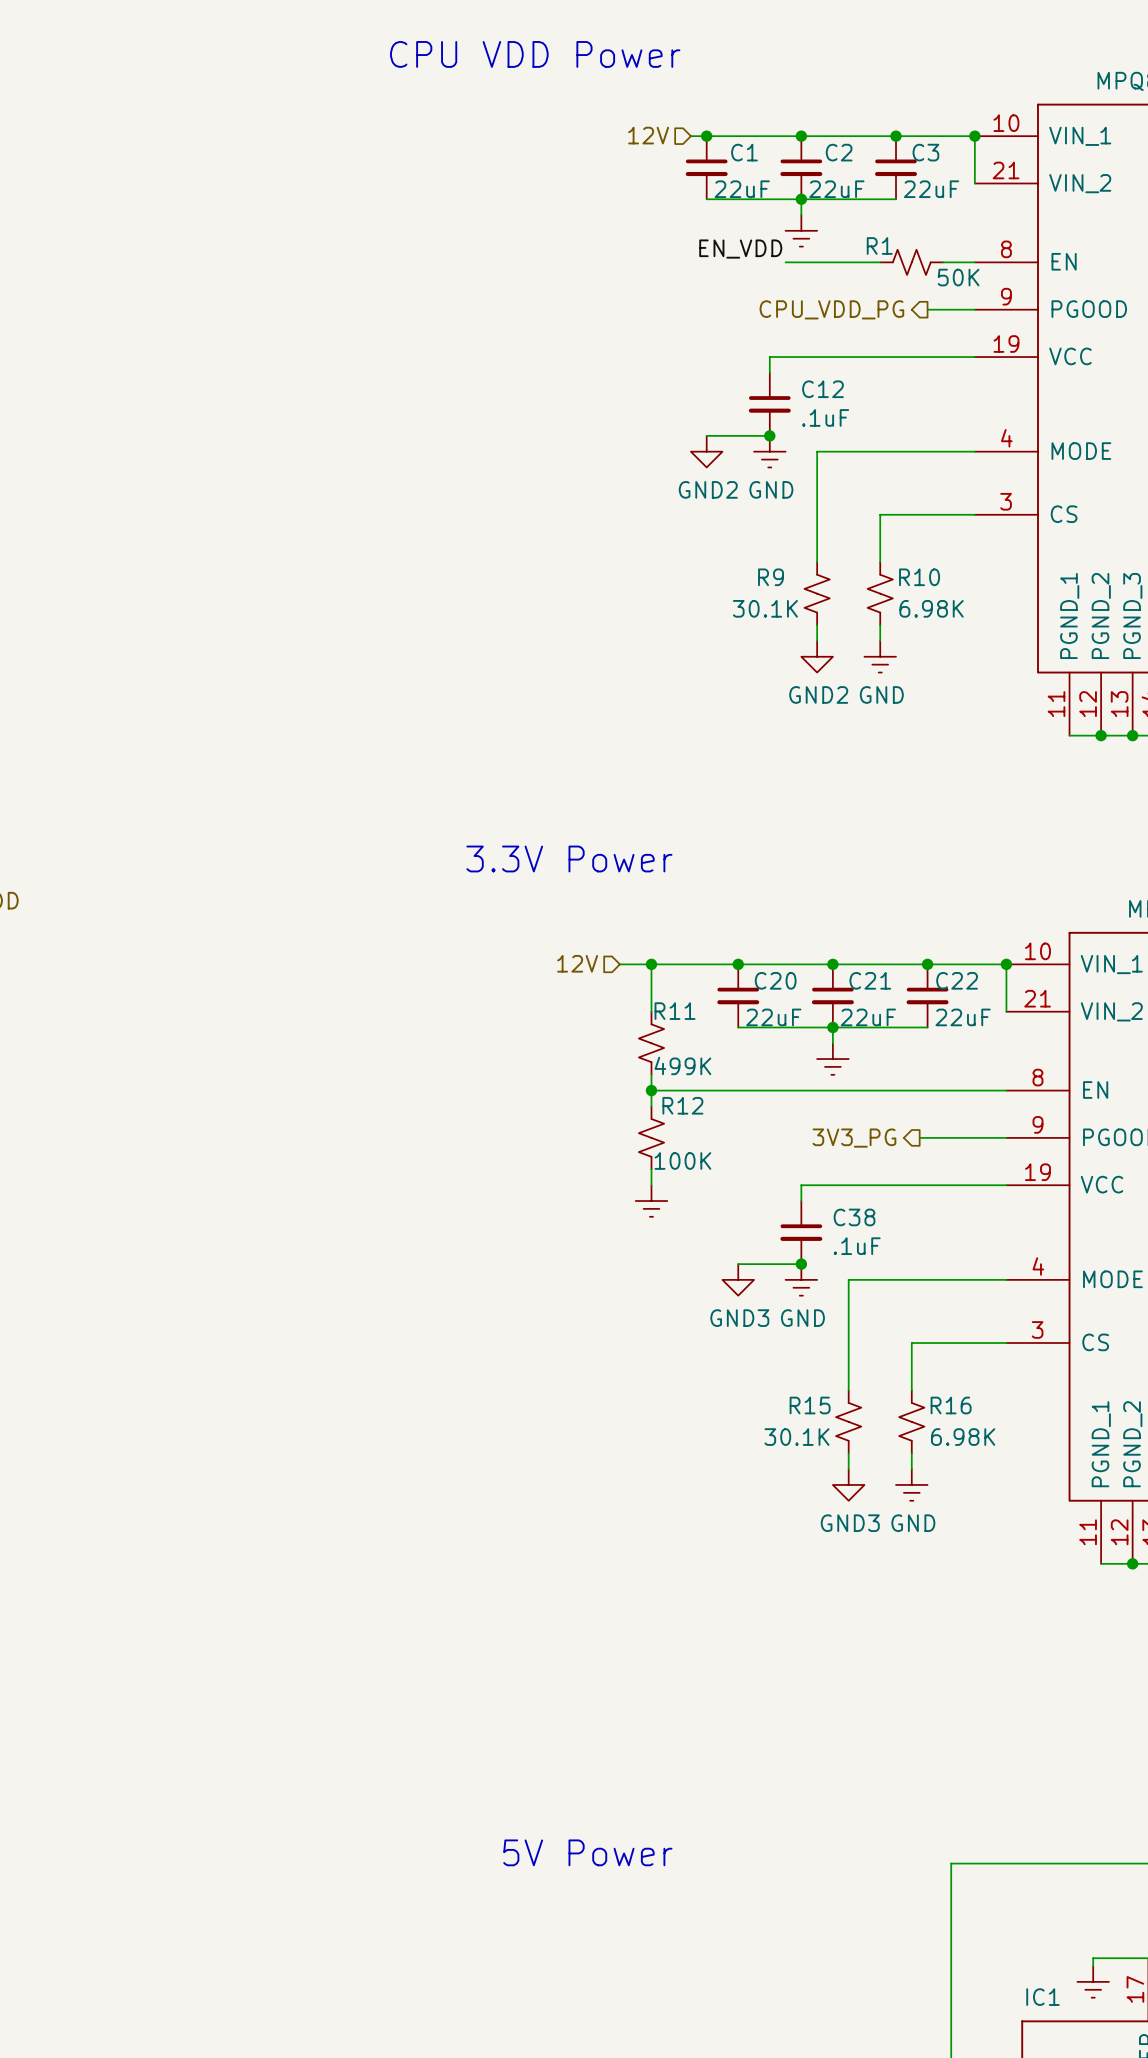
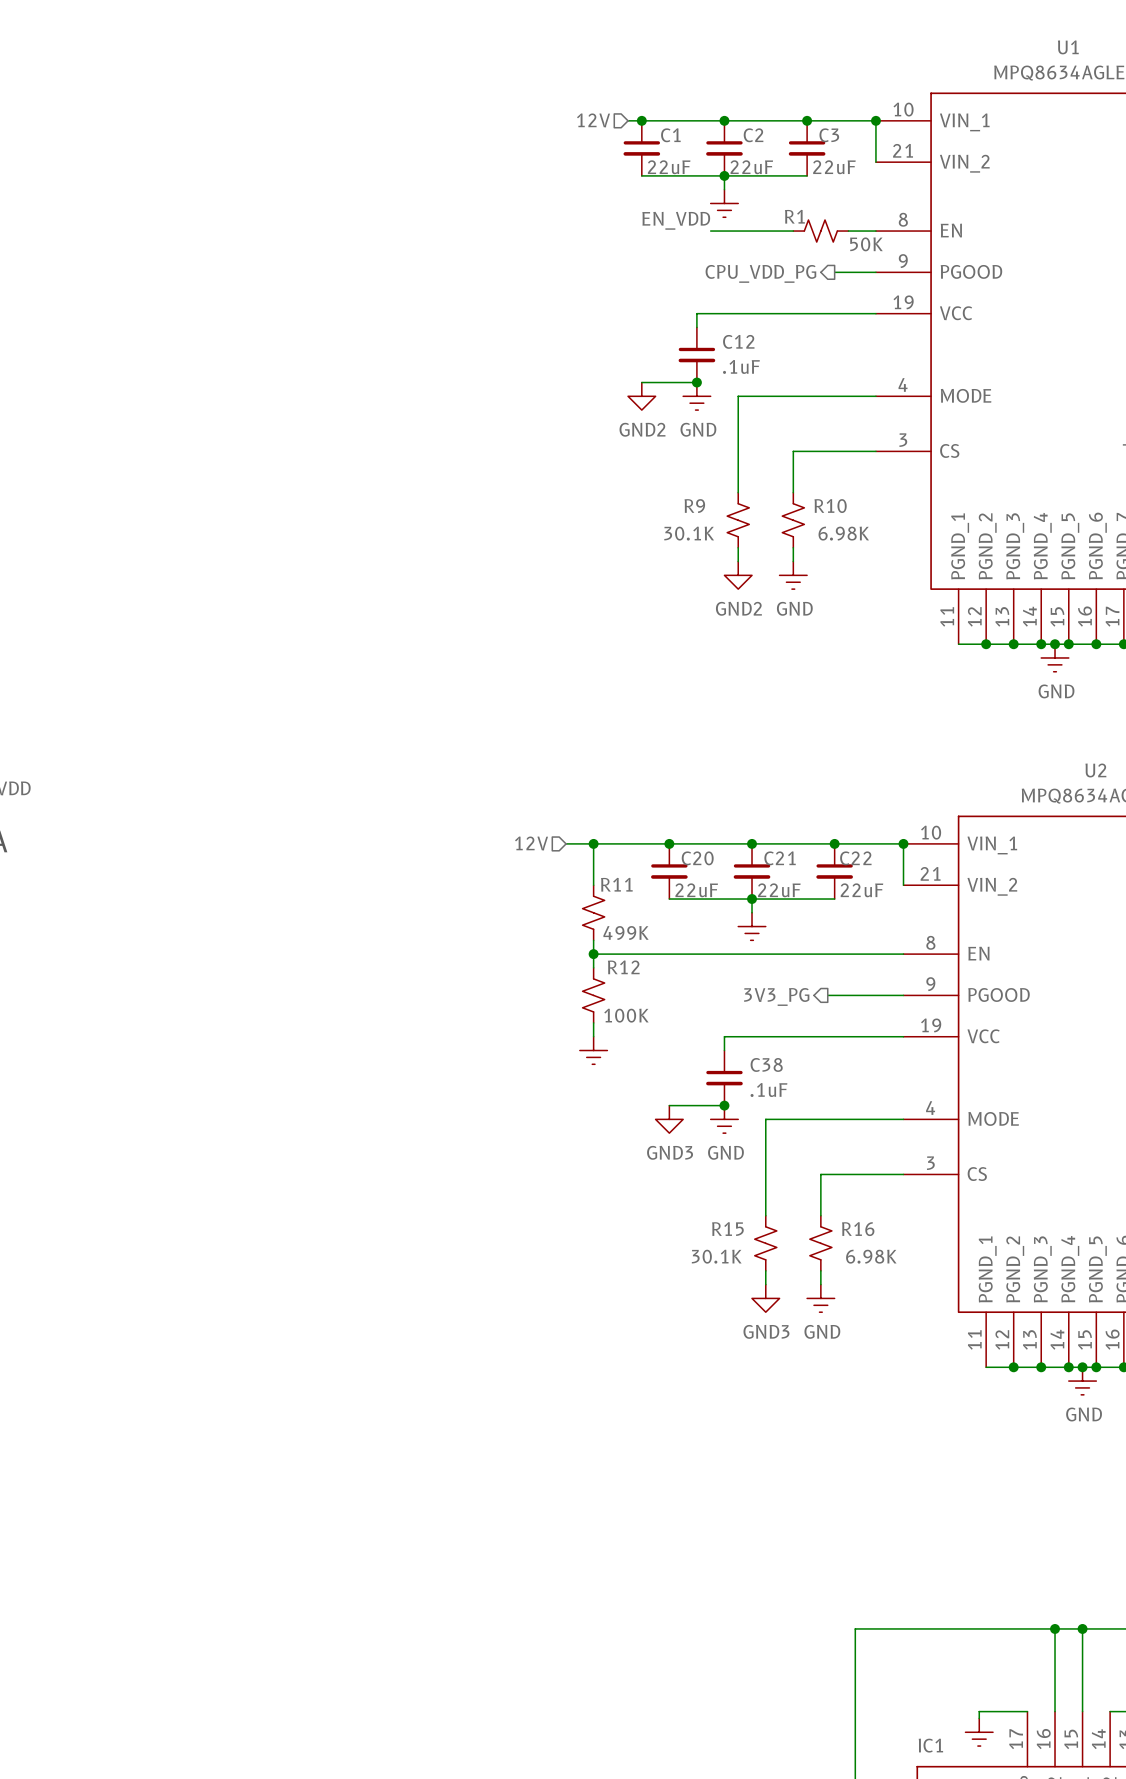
text: CPU VDD Power (535, 54) -> none
text: 3.3V Power (569, 858) -> none
text: 5V Power (587, 1852) -> none

